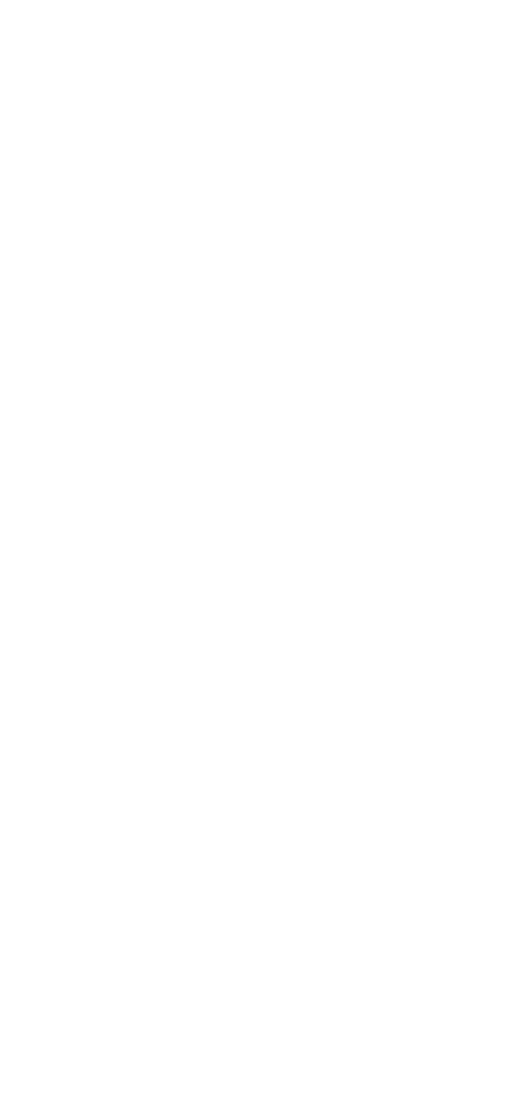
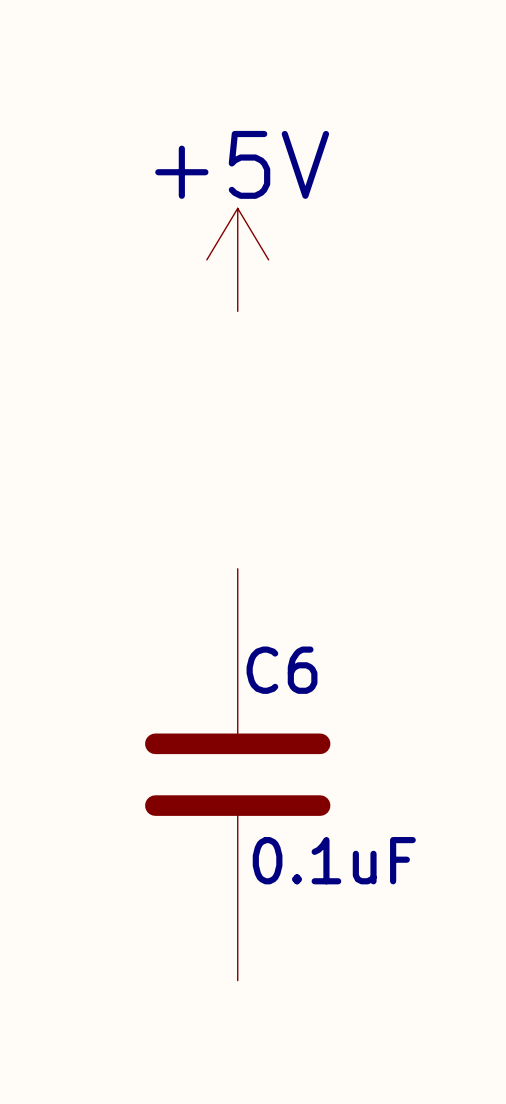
power symbol: none -> +5V (237, 259)
C6: none -> 0.1uF (237, 774)

